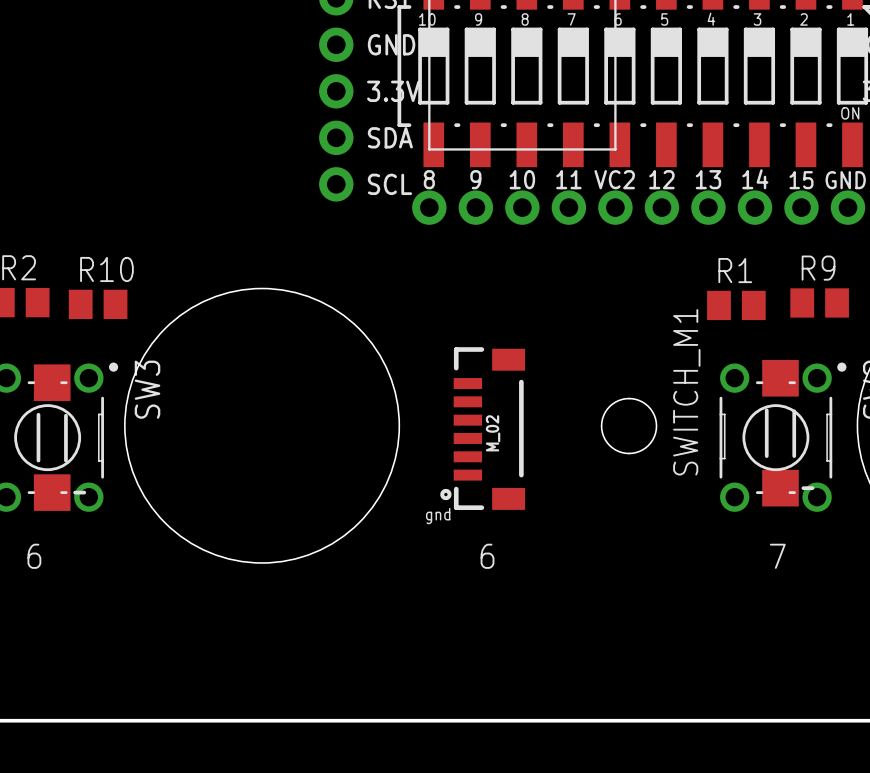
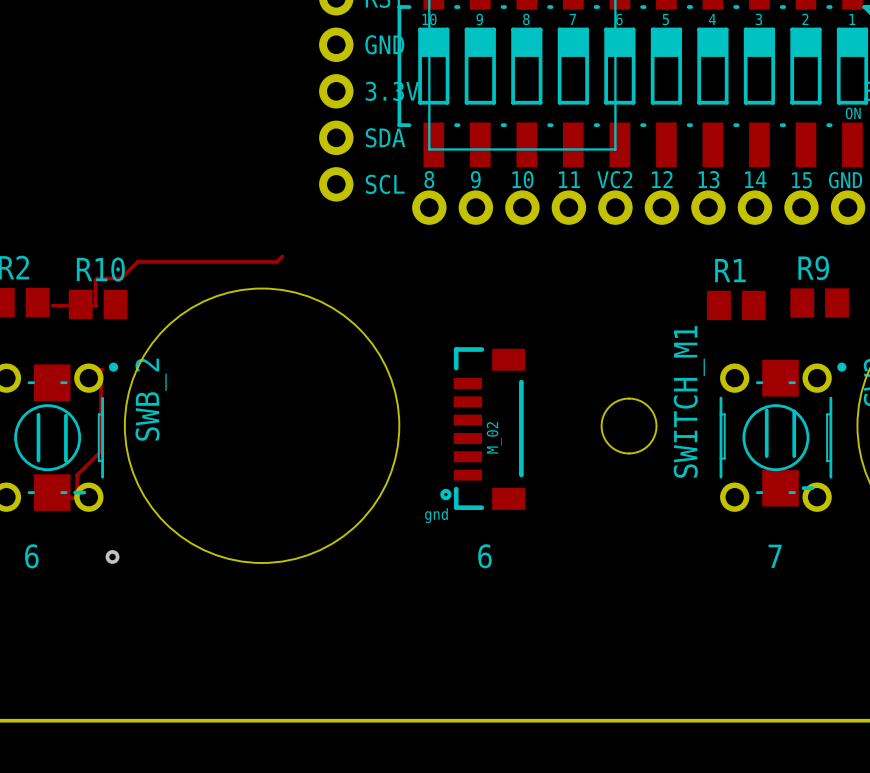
track: none -> (282, 256) (276, 261) (137, 261) (121, 278) (97, 278) (95, 280) (96, 305) (52, 305)
track: none -> (102, 369) (101, 451) (77, 475) (77, 496) (75, 498) (60, 498)
SW3 name: SW3 (147, 389) -> SWB_2 (151, 399)
via: none -> (112, 556)

